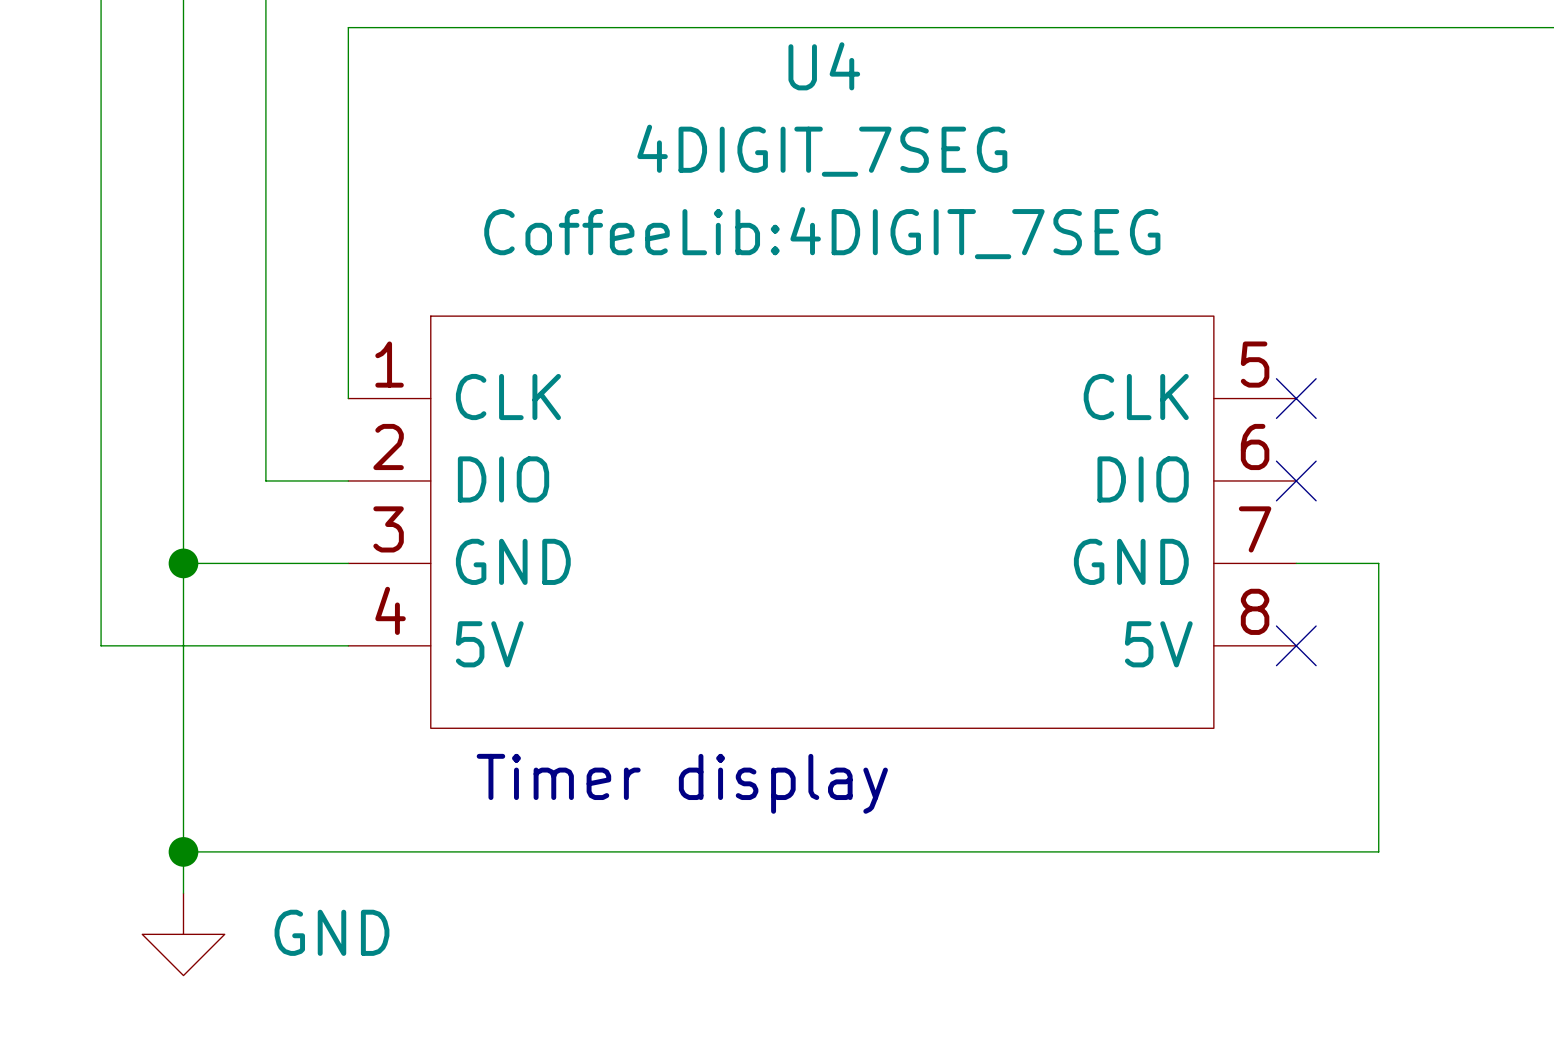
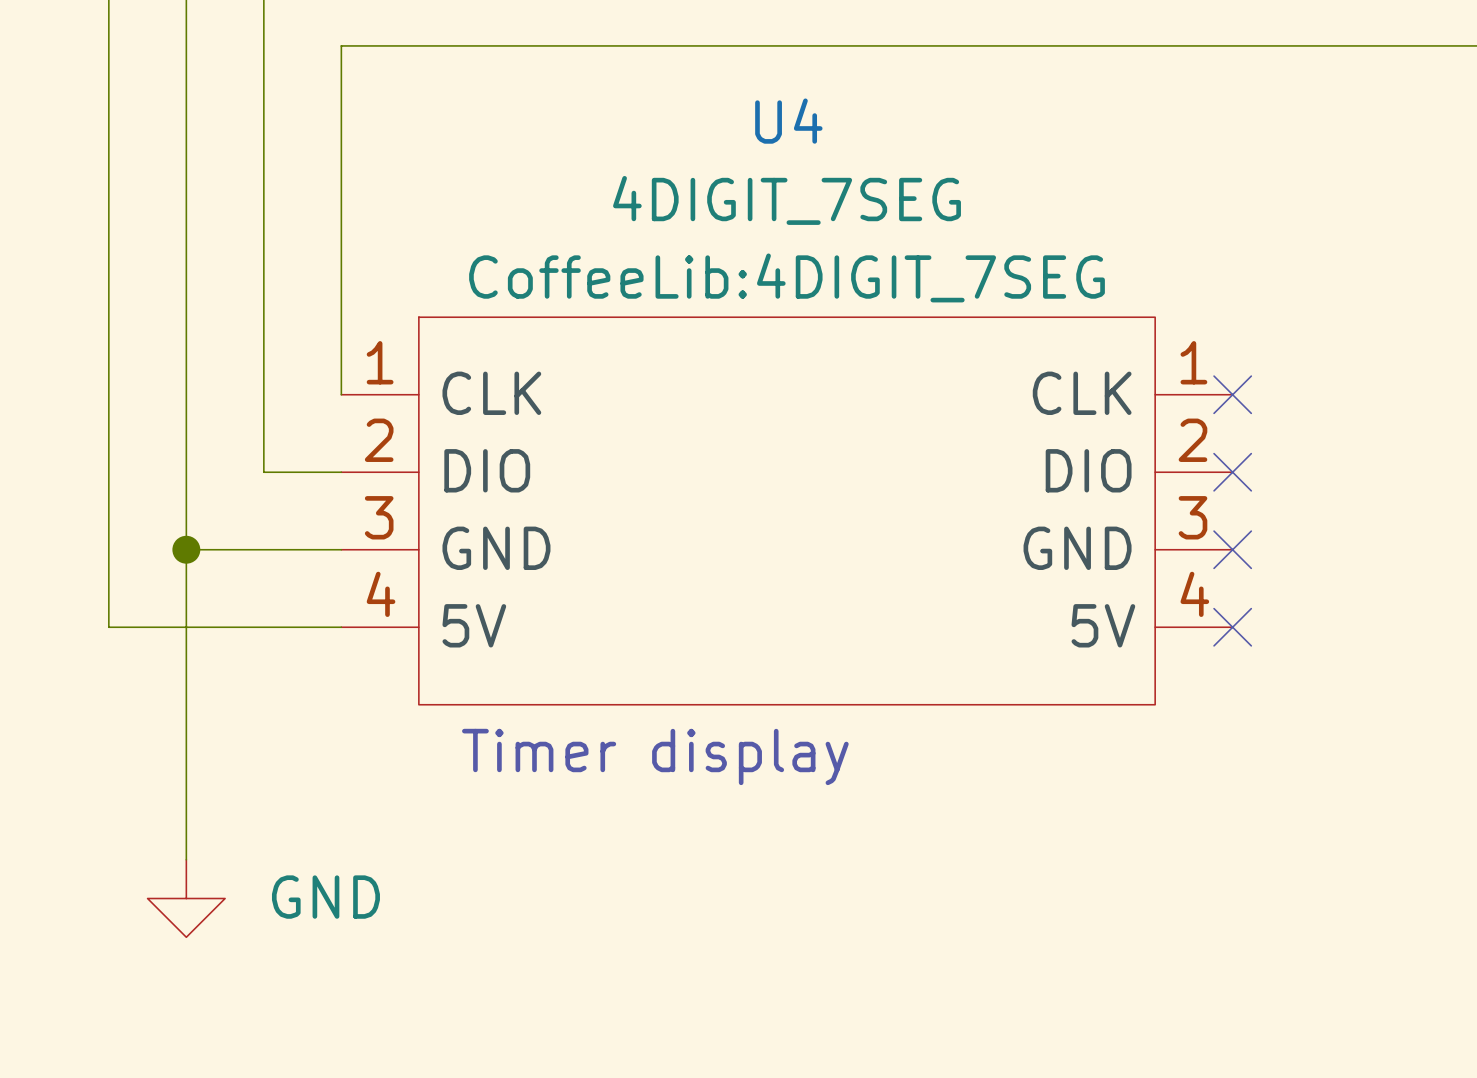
U4 name position: U4 (824, 66) -> U4 (788, 121)
U4 value position: 4DIGIT_7SEG (822, 150) -> 4DIGIT_7SEG (787, 200)
U4 text position: CoffeeLib:4DIGIT_7SEG (822, 233) -> CoffeeLib:4DIGIT_7SEG (787, 277)
U4 pin number: 5 (1255, 364) -> 1 (1193, 362)
U4 pin number: 6 (1255, 446) -> 2 (1192, 440)
U4 pin number: 7 (1255, 529) -> 3 (1192, 517)
wire: (1296, 563) (1378, 563) (1378, 851) (183, 851) -> none
no-connect mark: none -> (1232, 549)
U4 pin number: 8 (1255, 611) -> 4 (1194, 594)
junction: (183, 851) -> none

